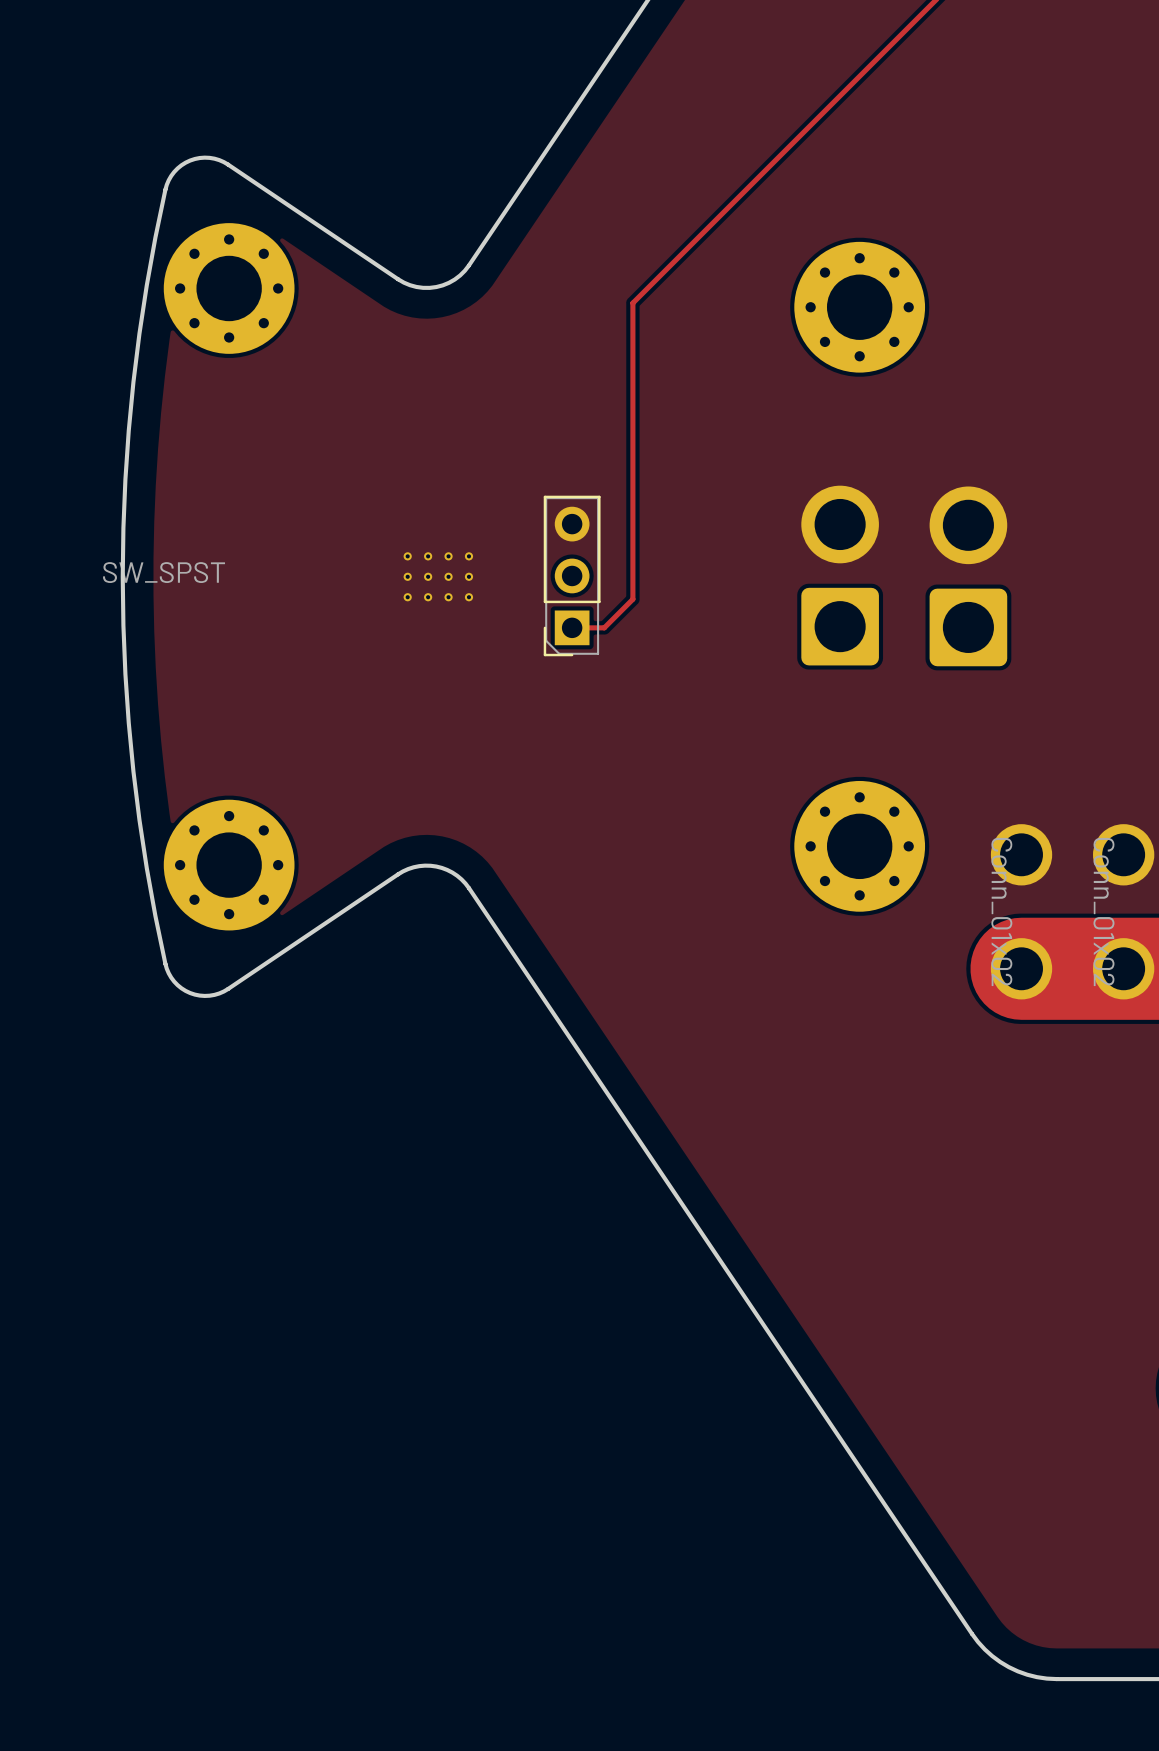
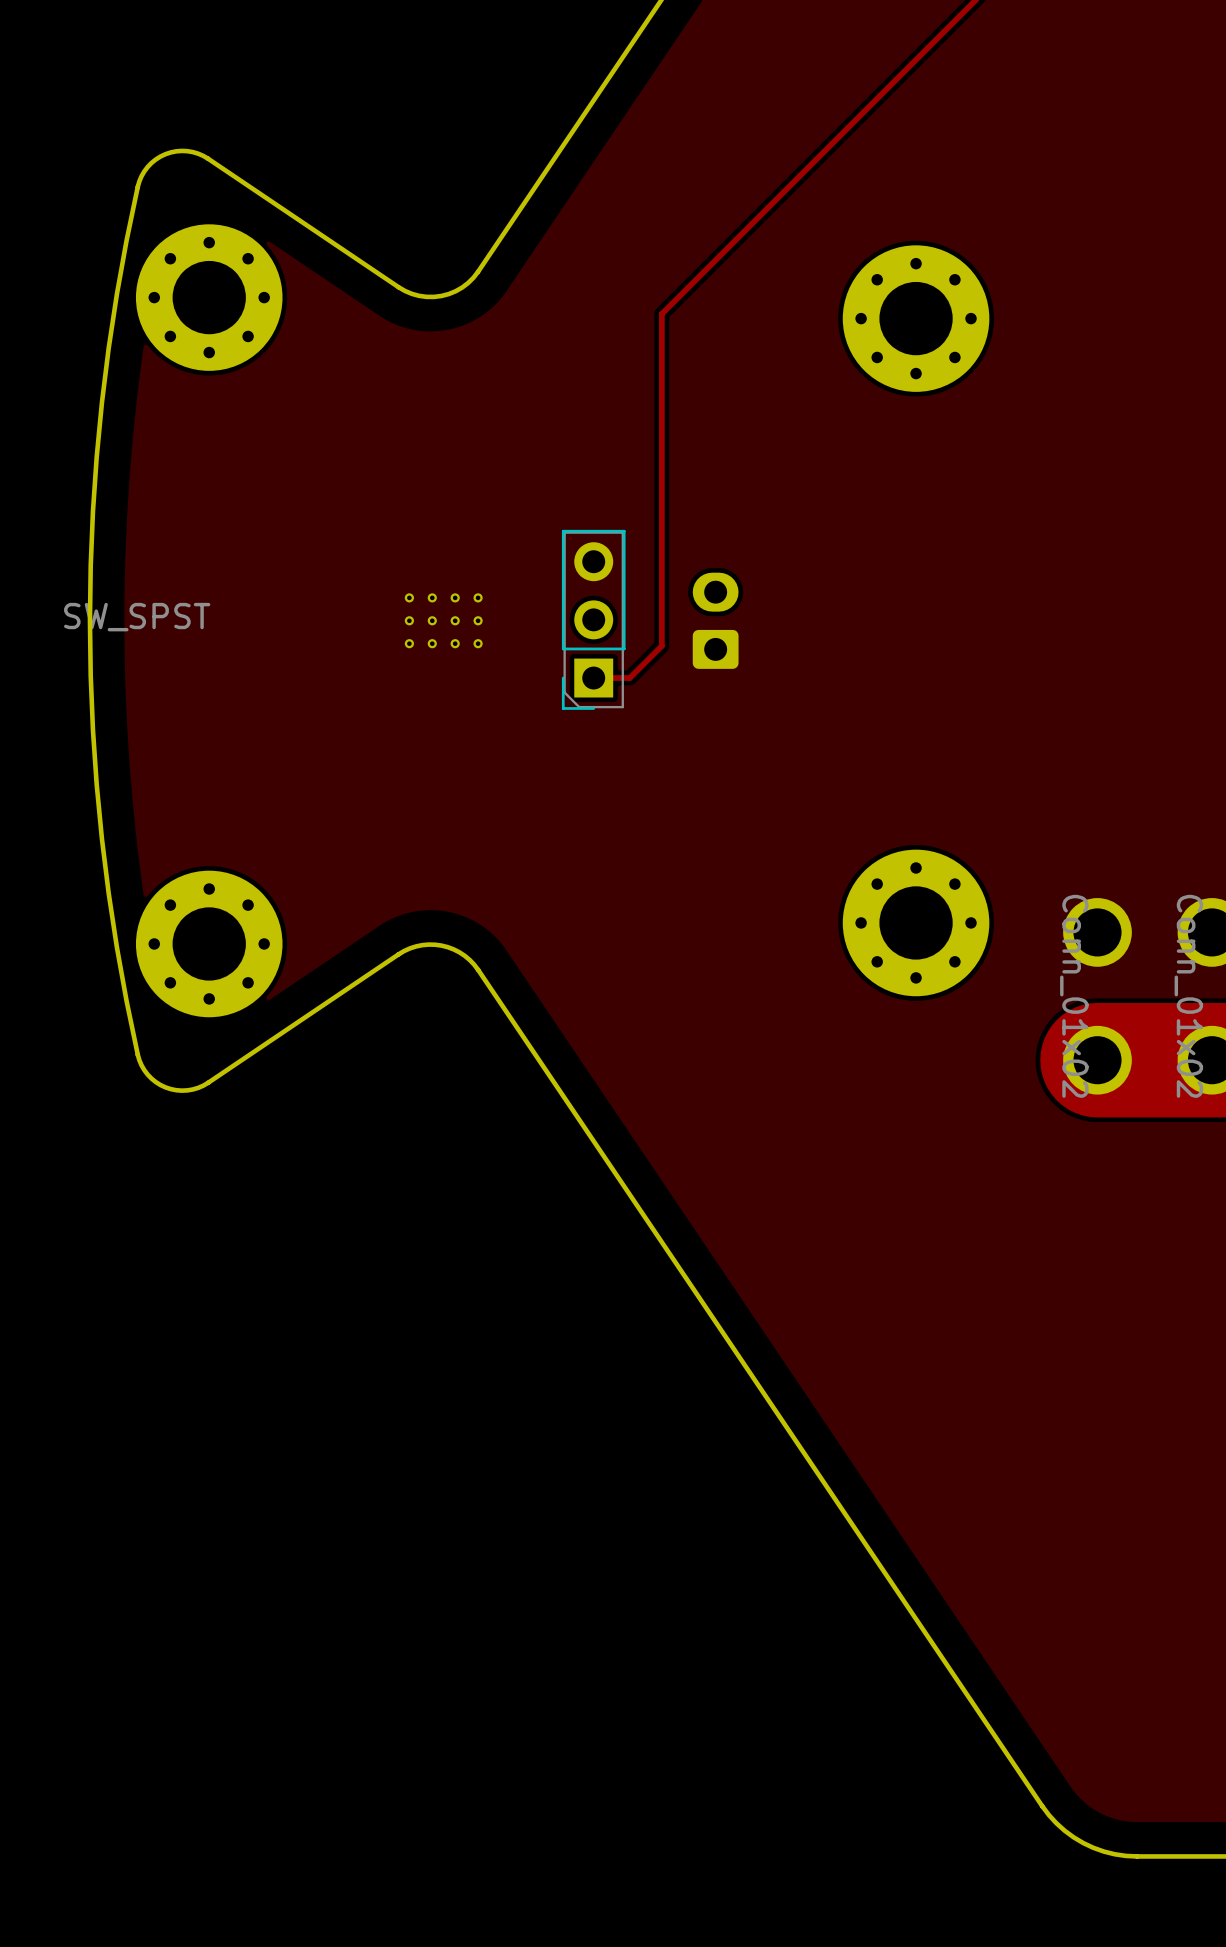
part: (840, 575) -> none
part: none -> (715, 620)
part: (968, 576) -> none

